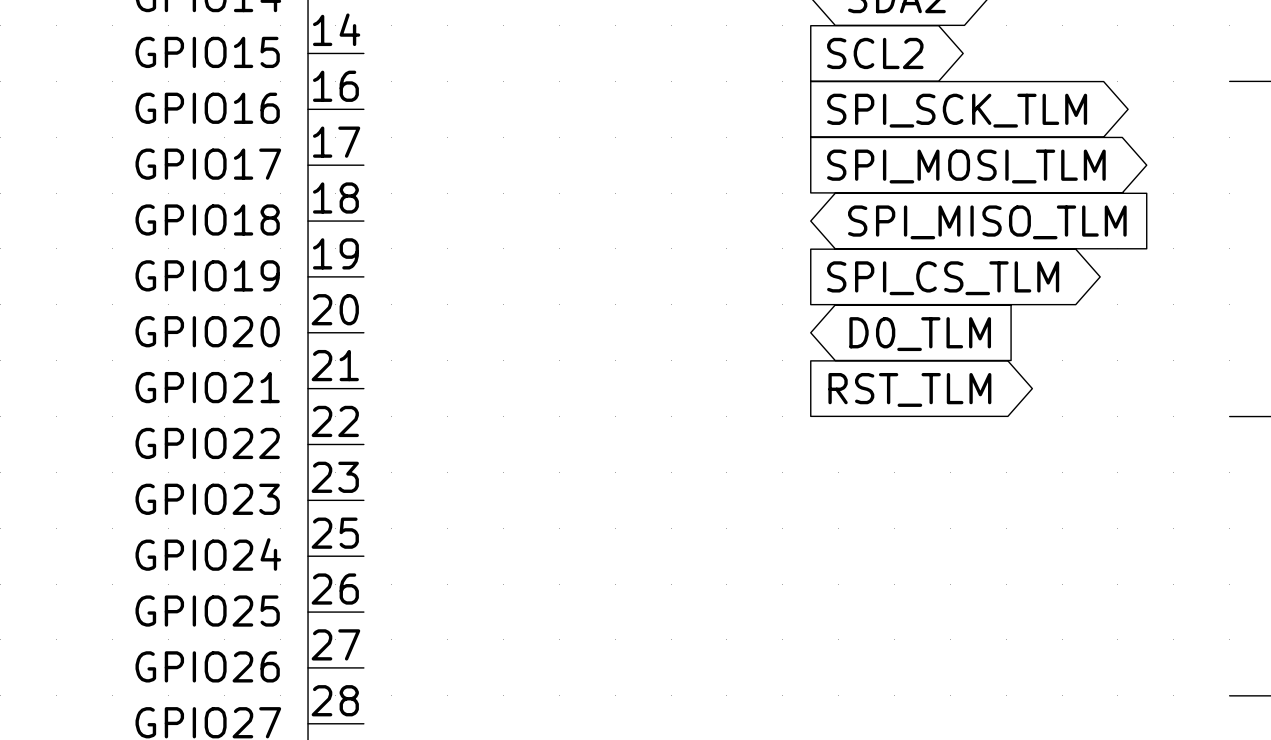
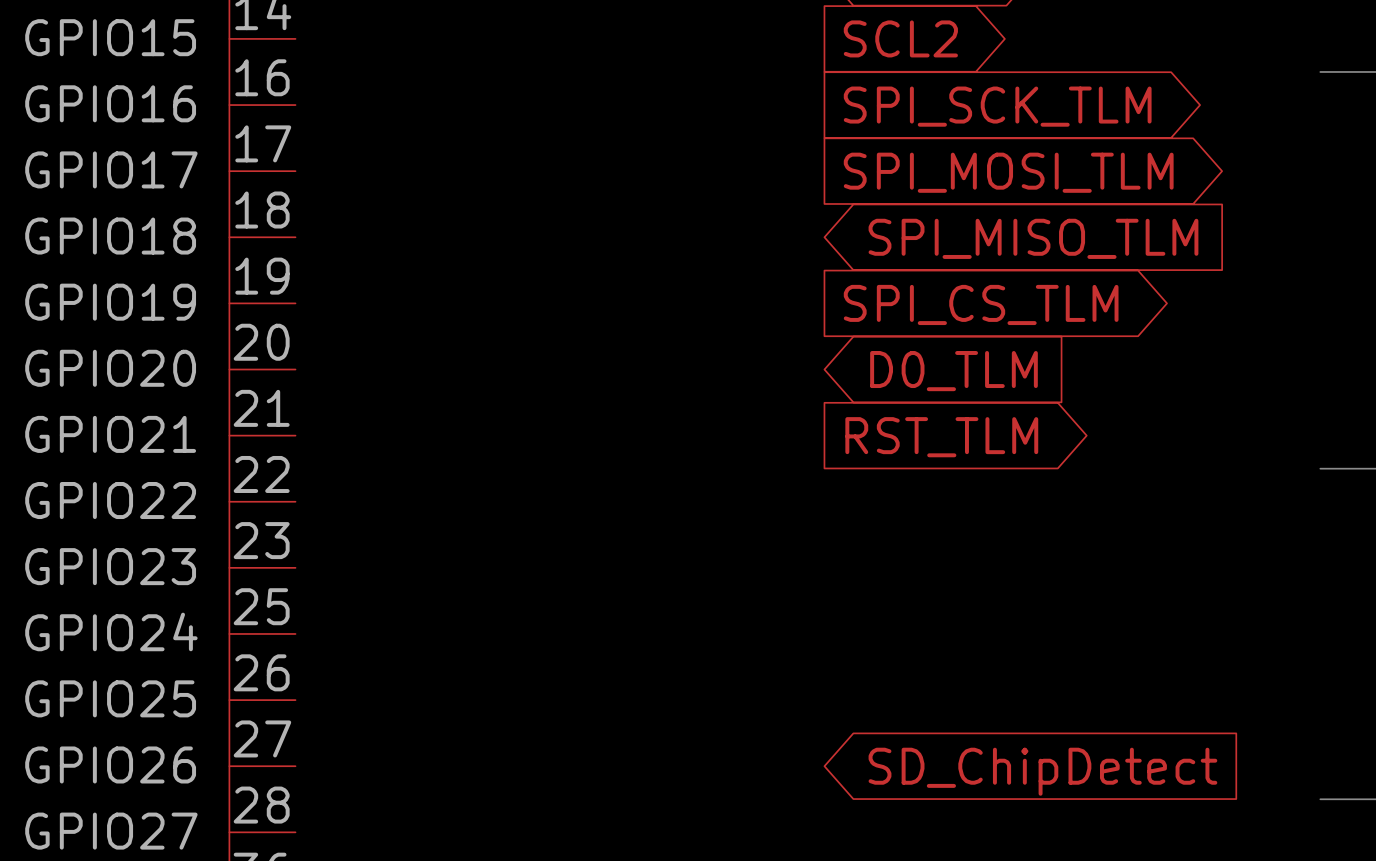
global label: none -> SD_ChipDetect (1042, 771)

